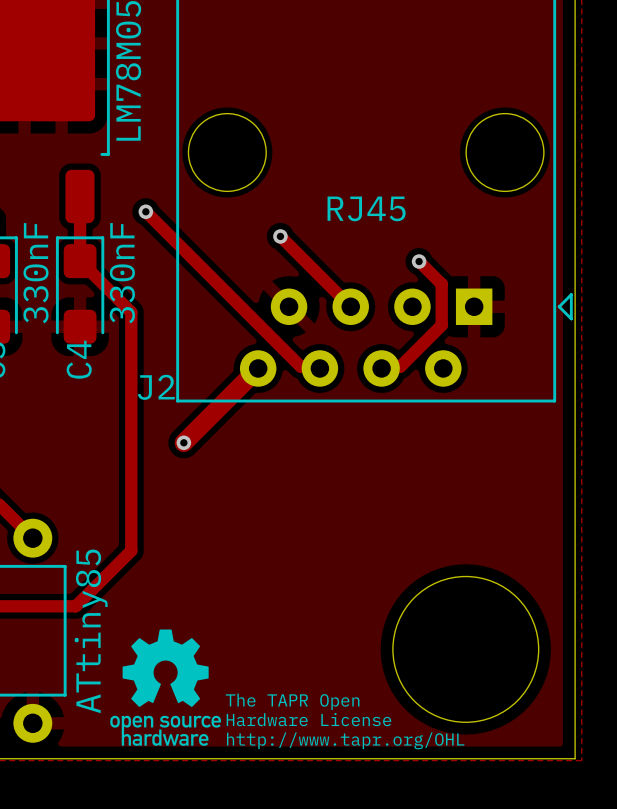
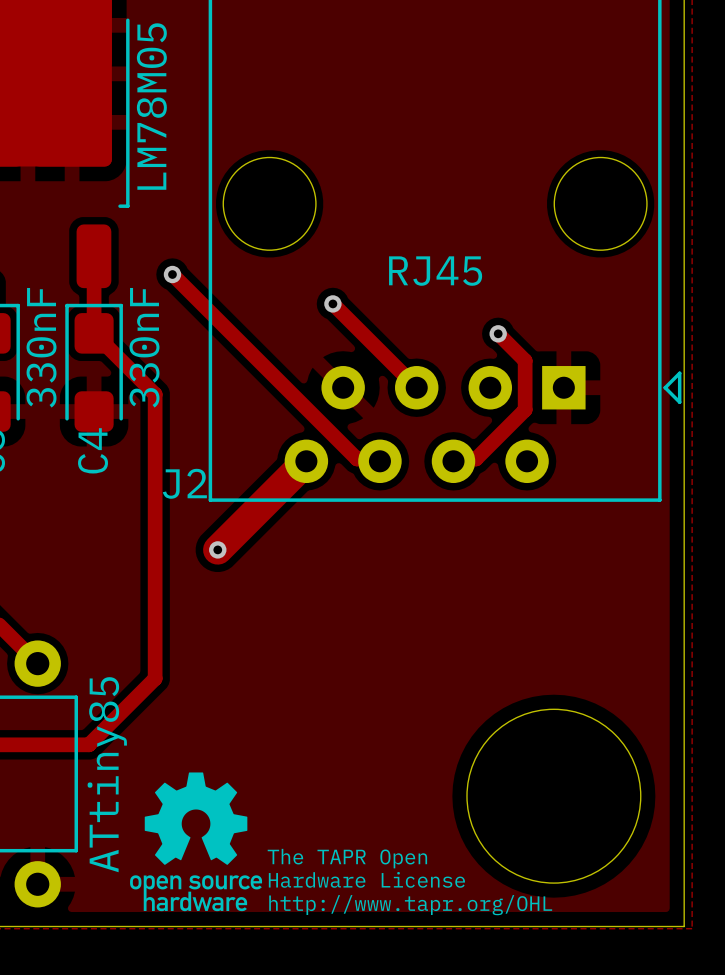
track width: thin (258, 368) (183, 442) -> thick (306, 461) (217, 549)

